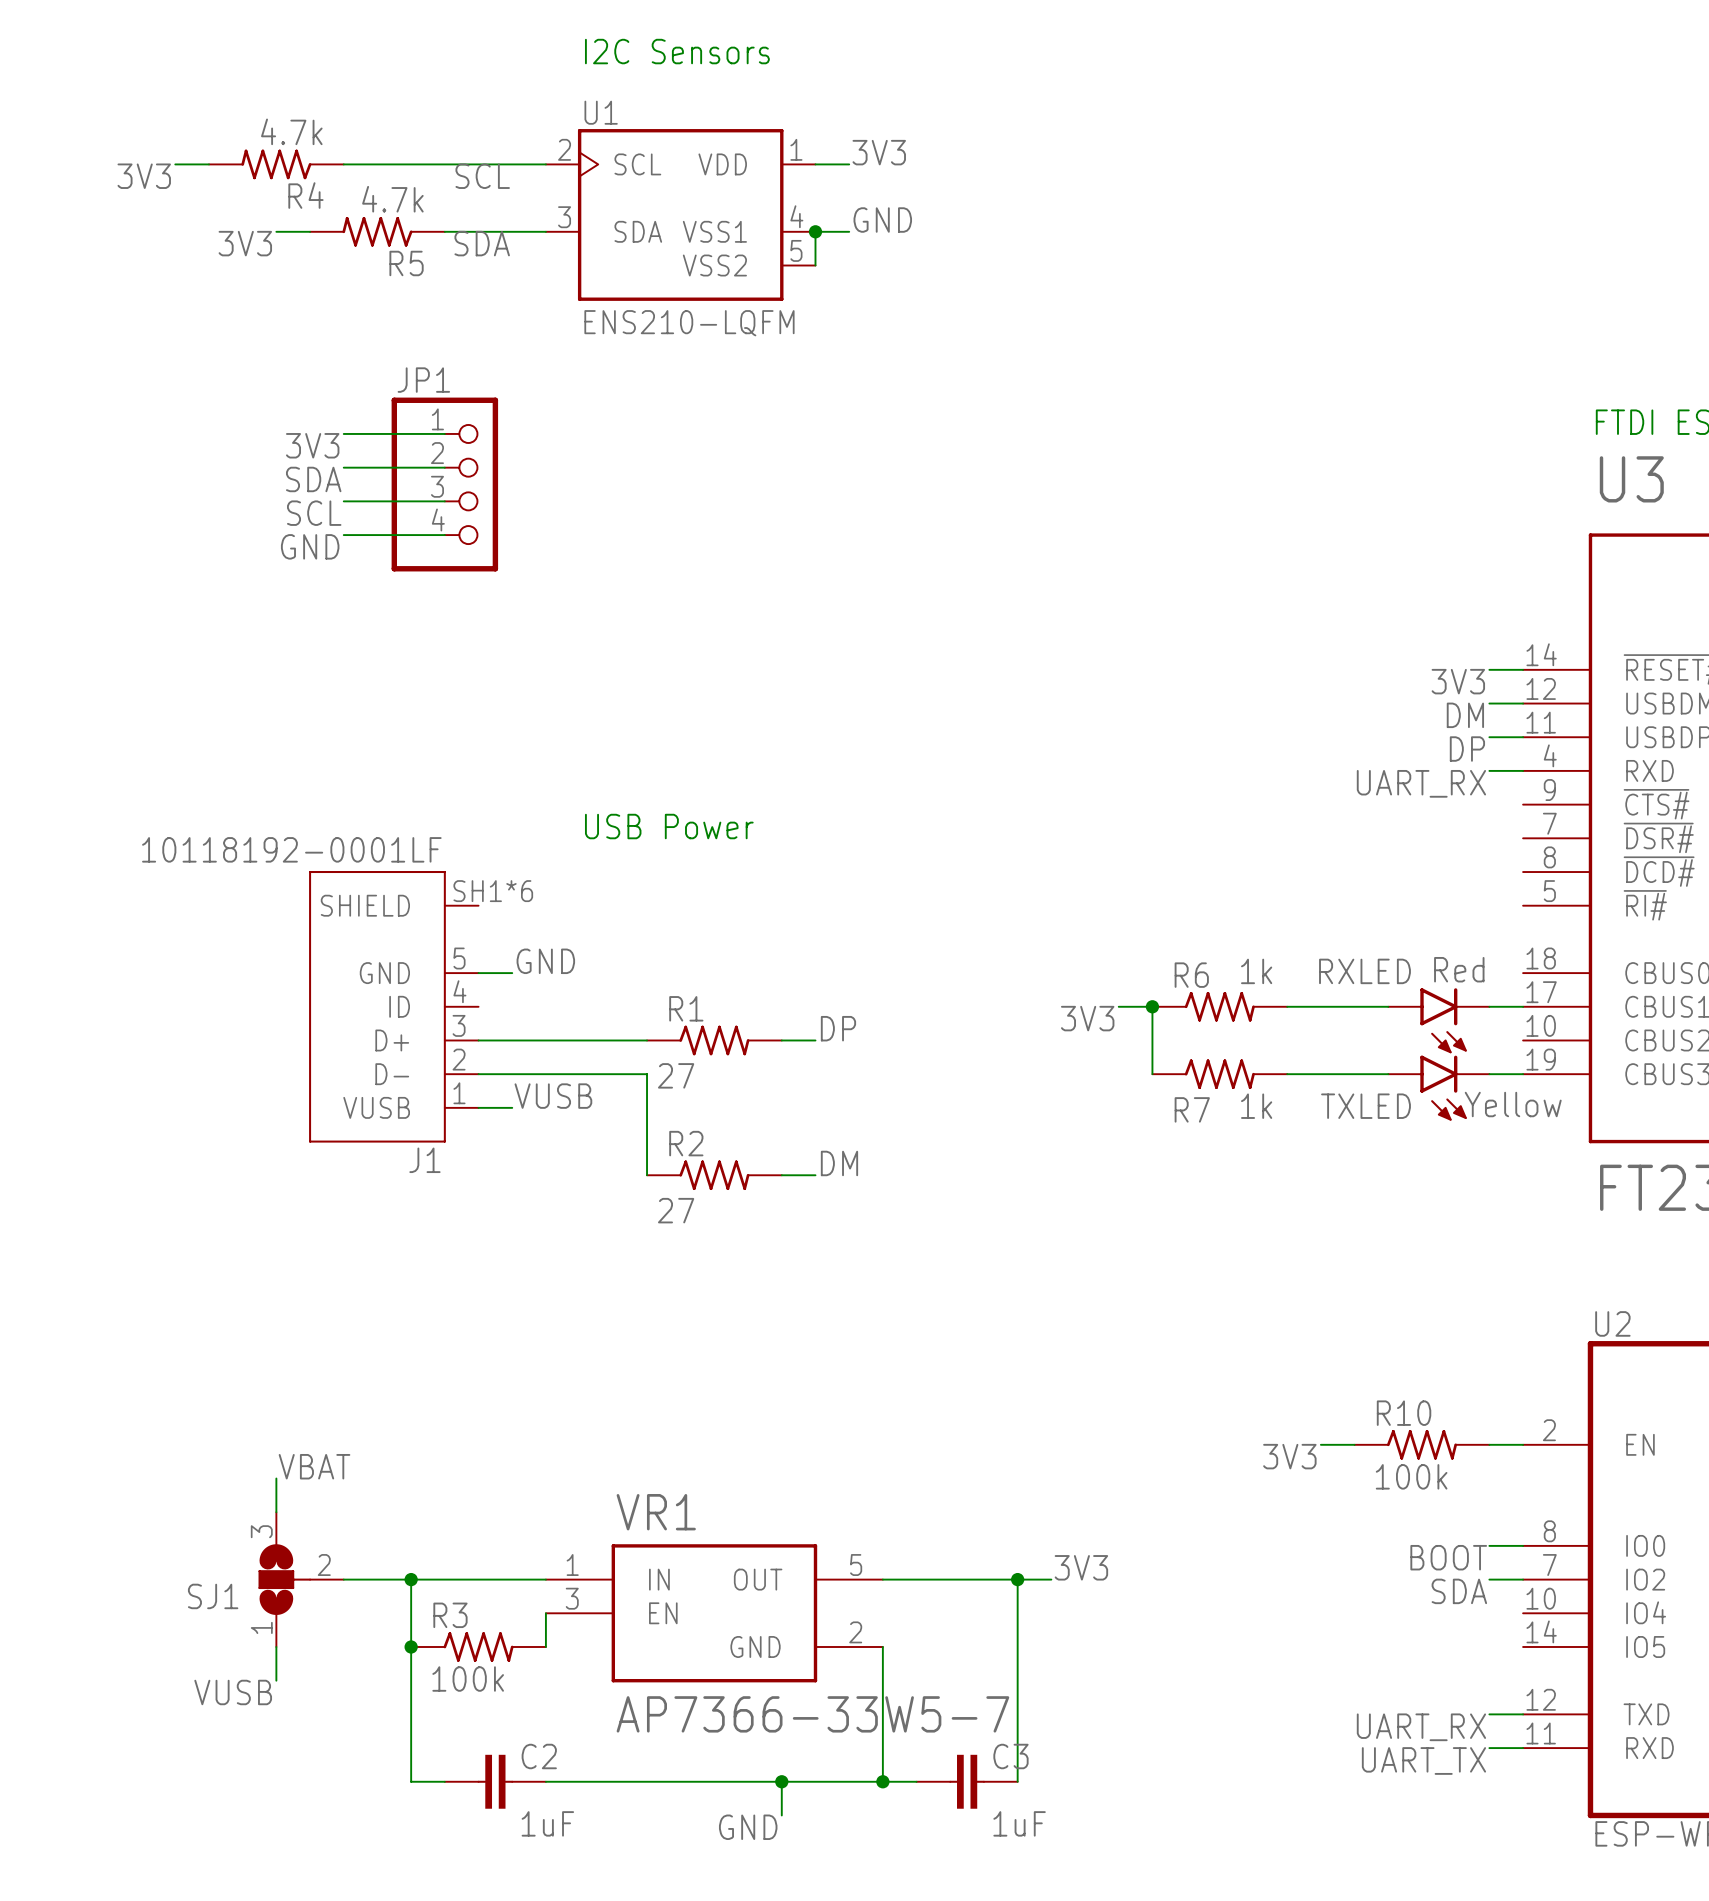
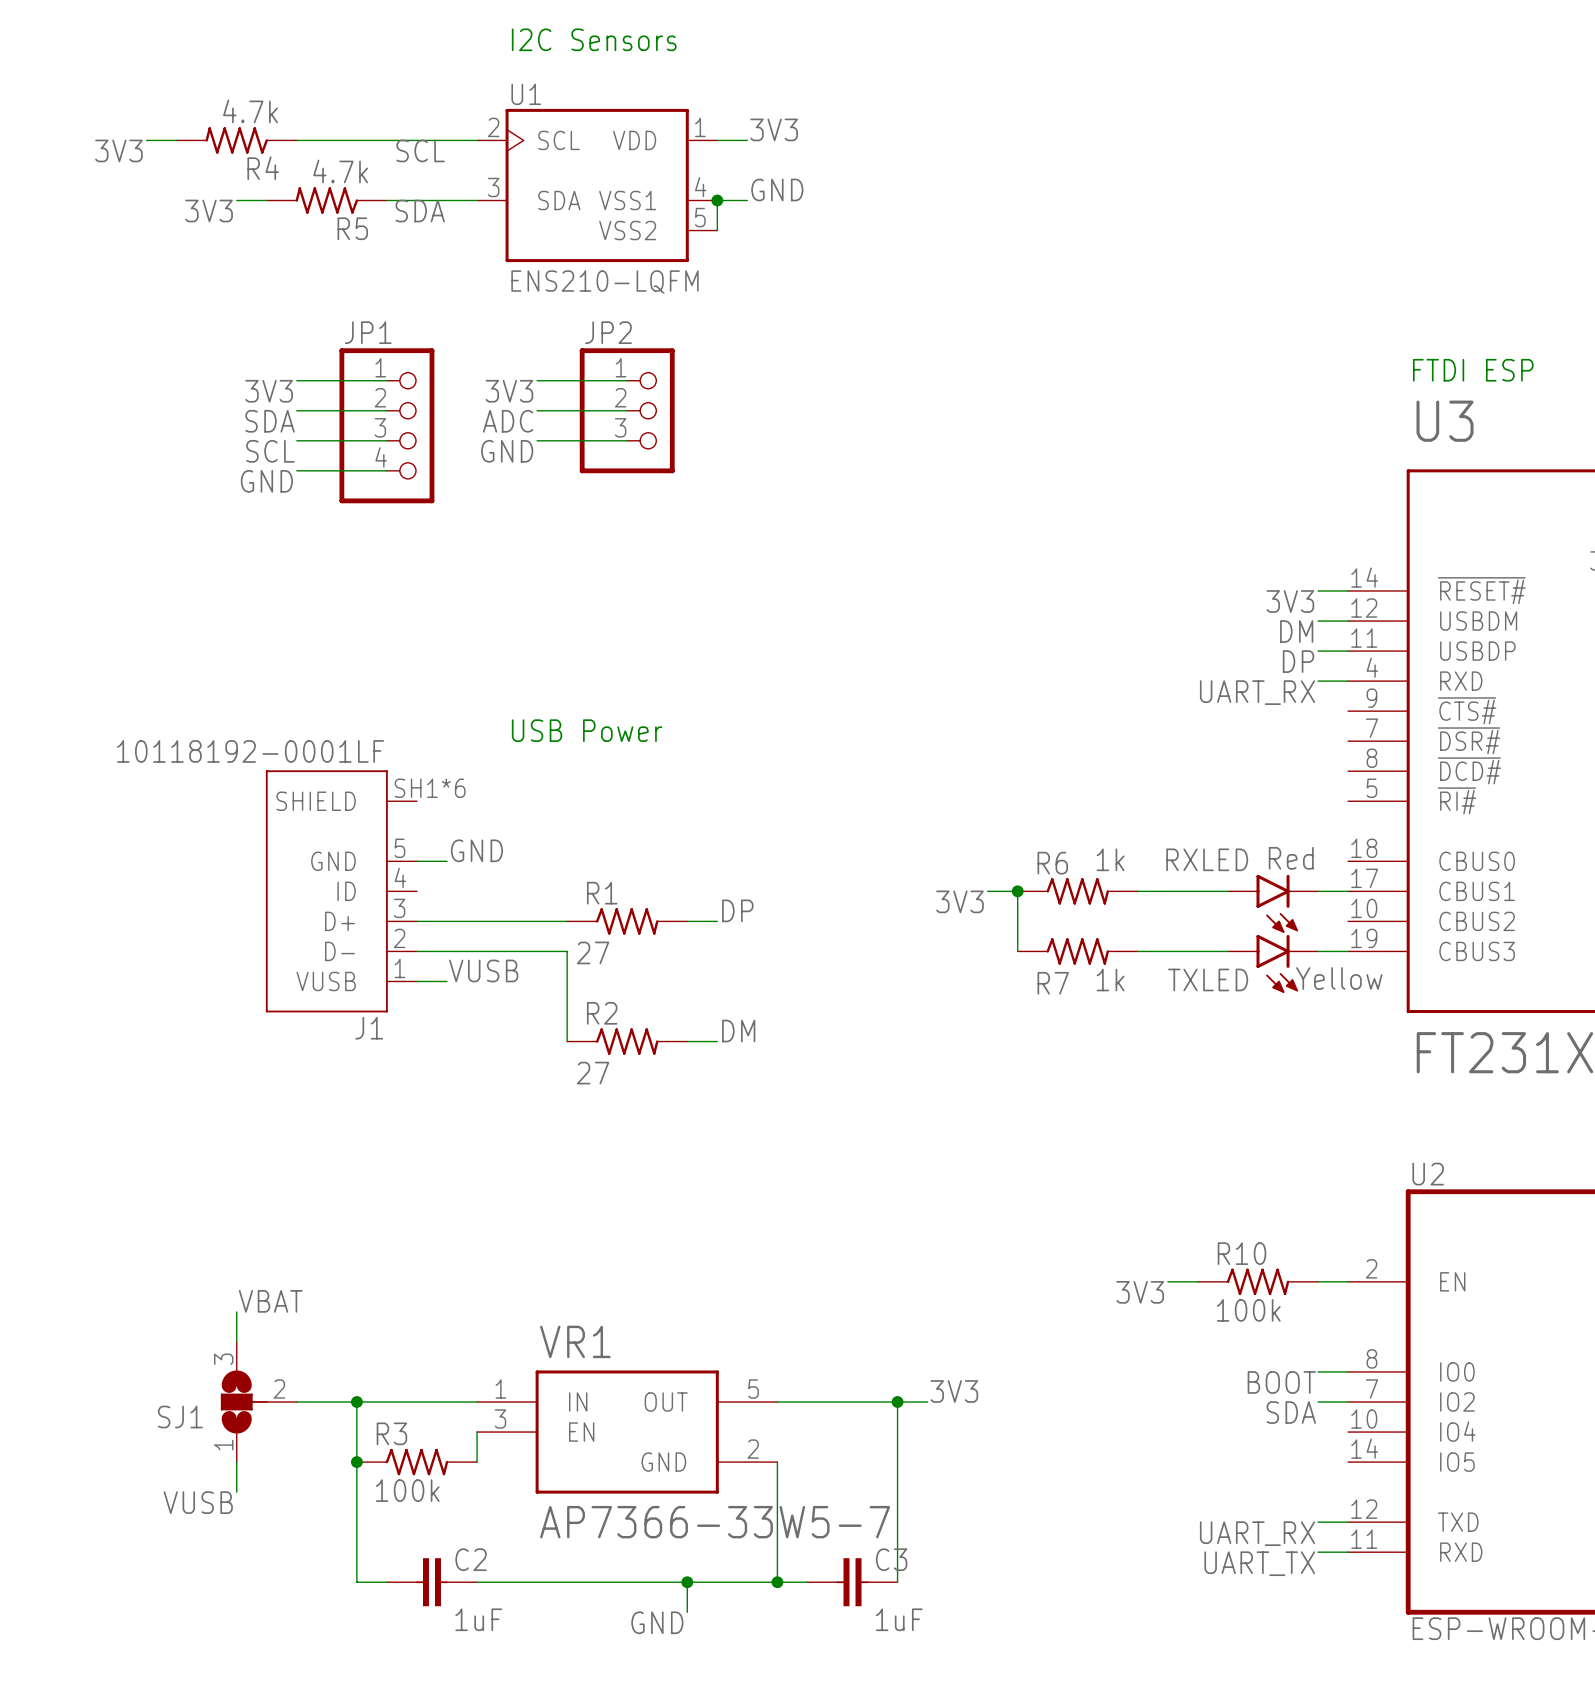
wire: none -> (537, 380) (627, 380)
label: none -> 3V3 (509, 391)
wire: none -> (537, 410) (627, 410)
JP2: none -> (627, 410)
label: none -> ADC (508, 421)
wire: none -> (537, 440) (627, 440)
label: none -> GND (507, 451)

